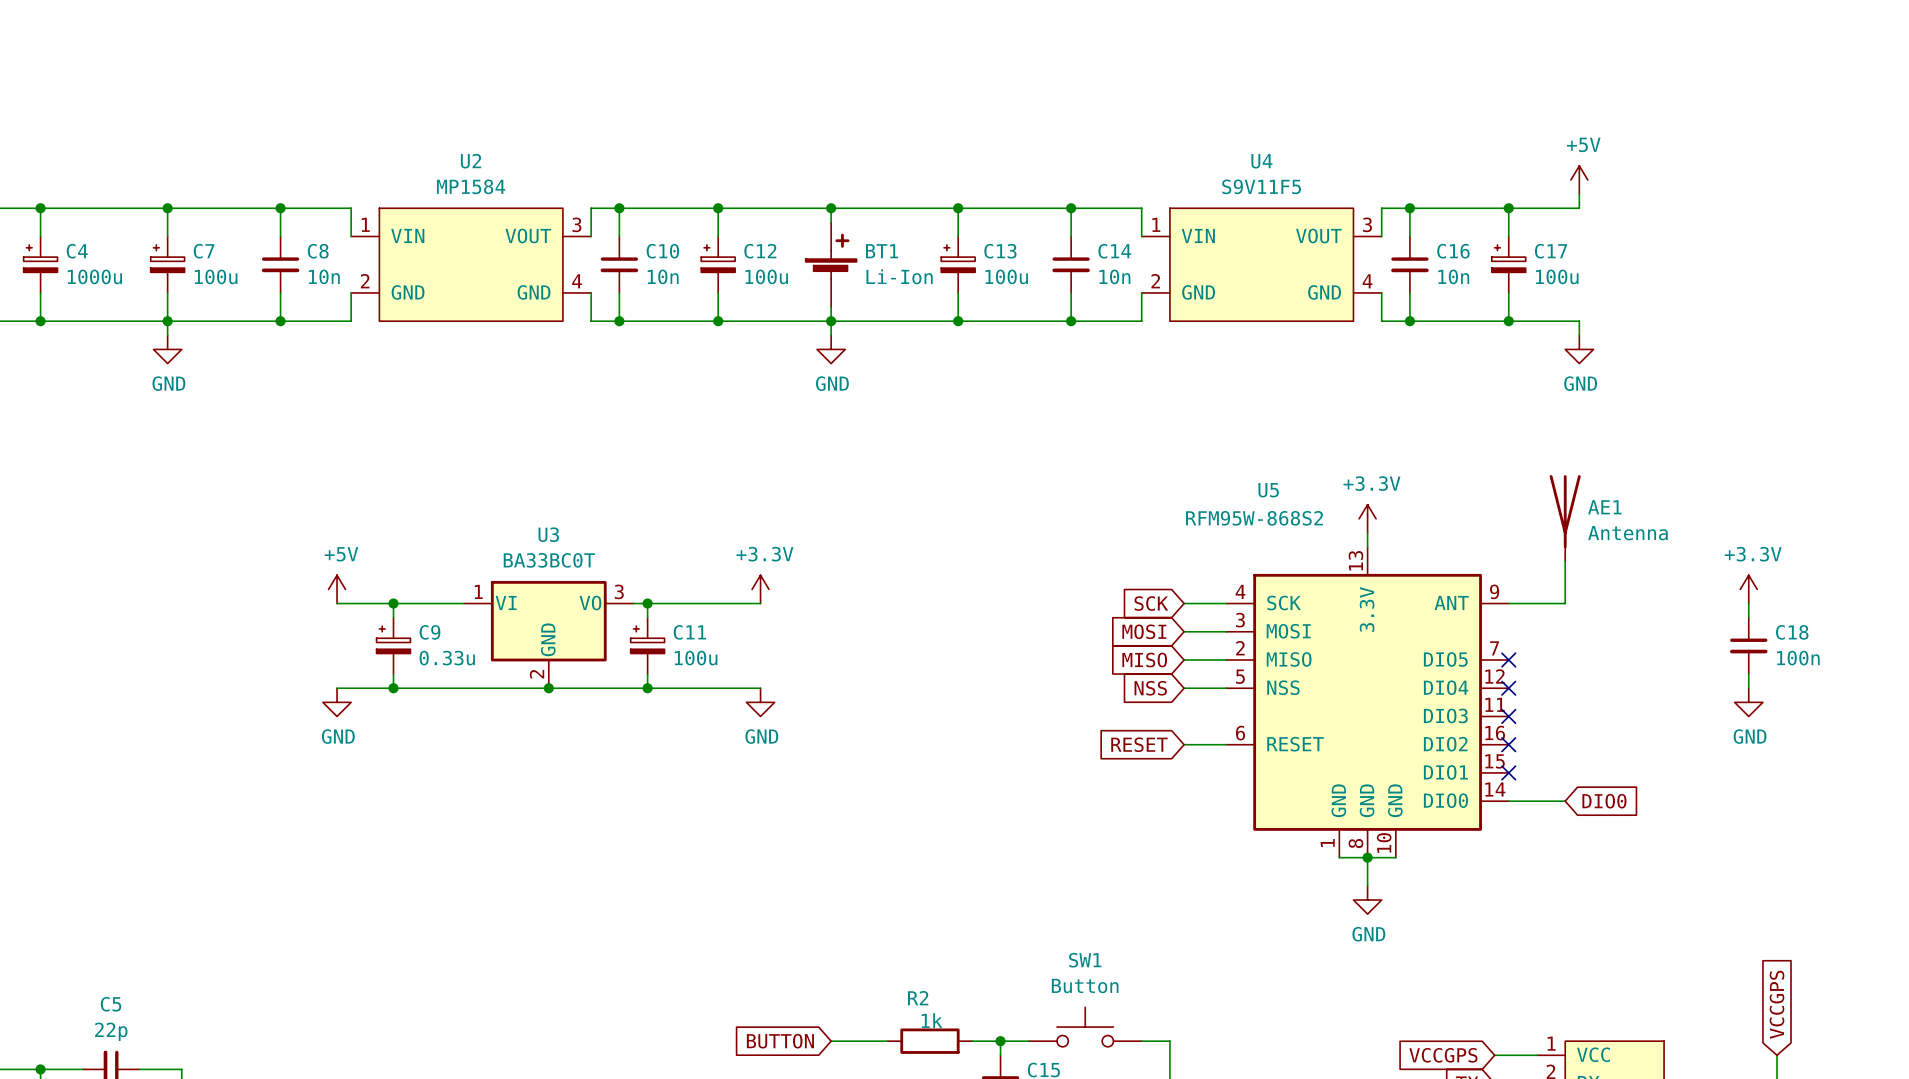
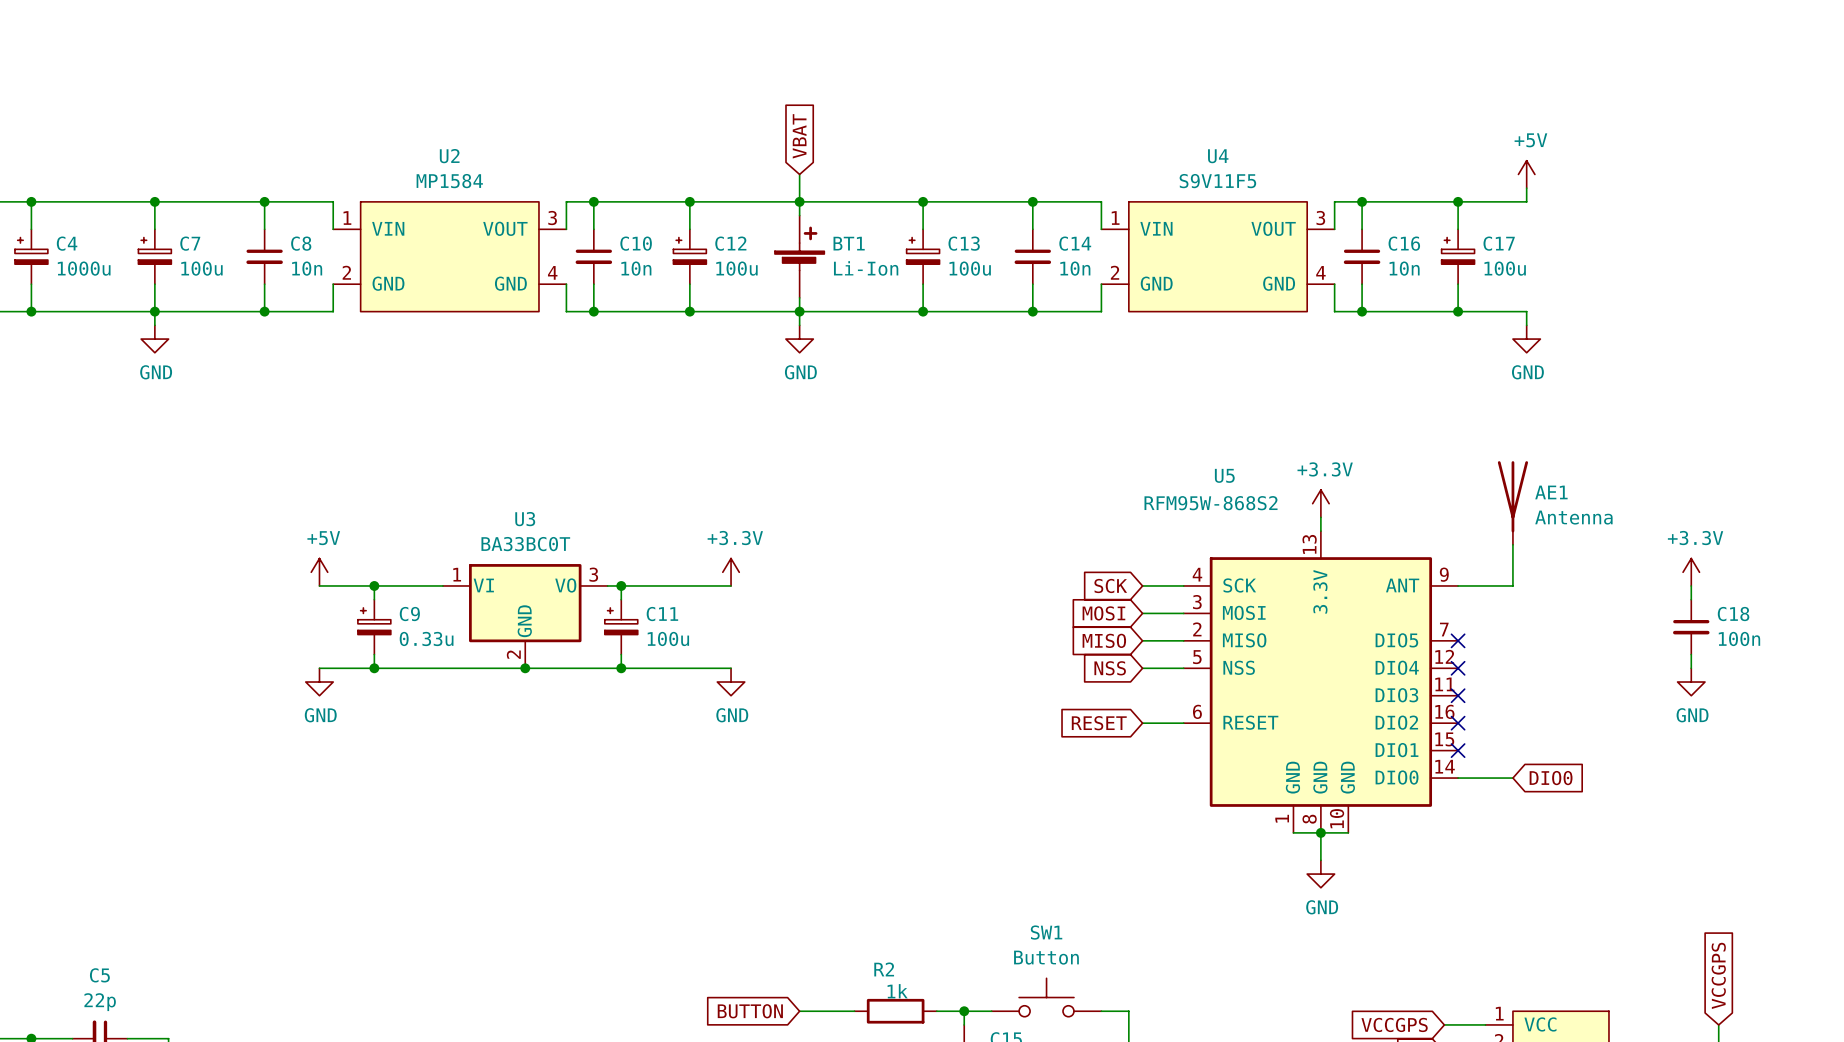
global label: none -> VBAT (799, 136)
wire: none -> (799, 174) (799, 201)

